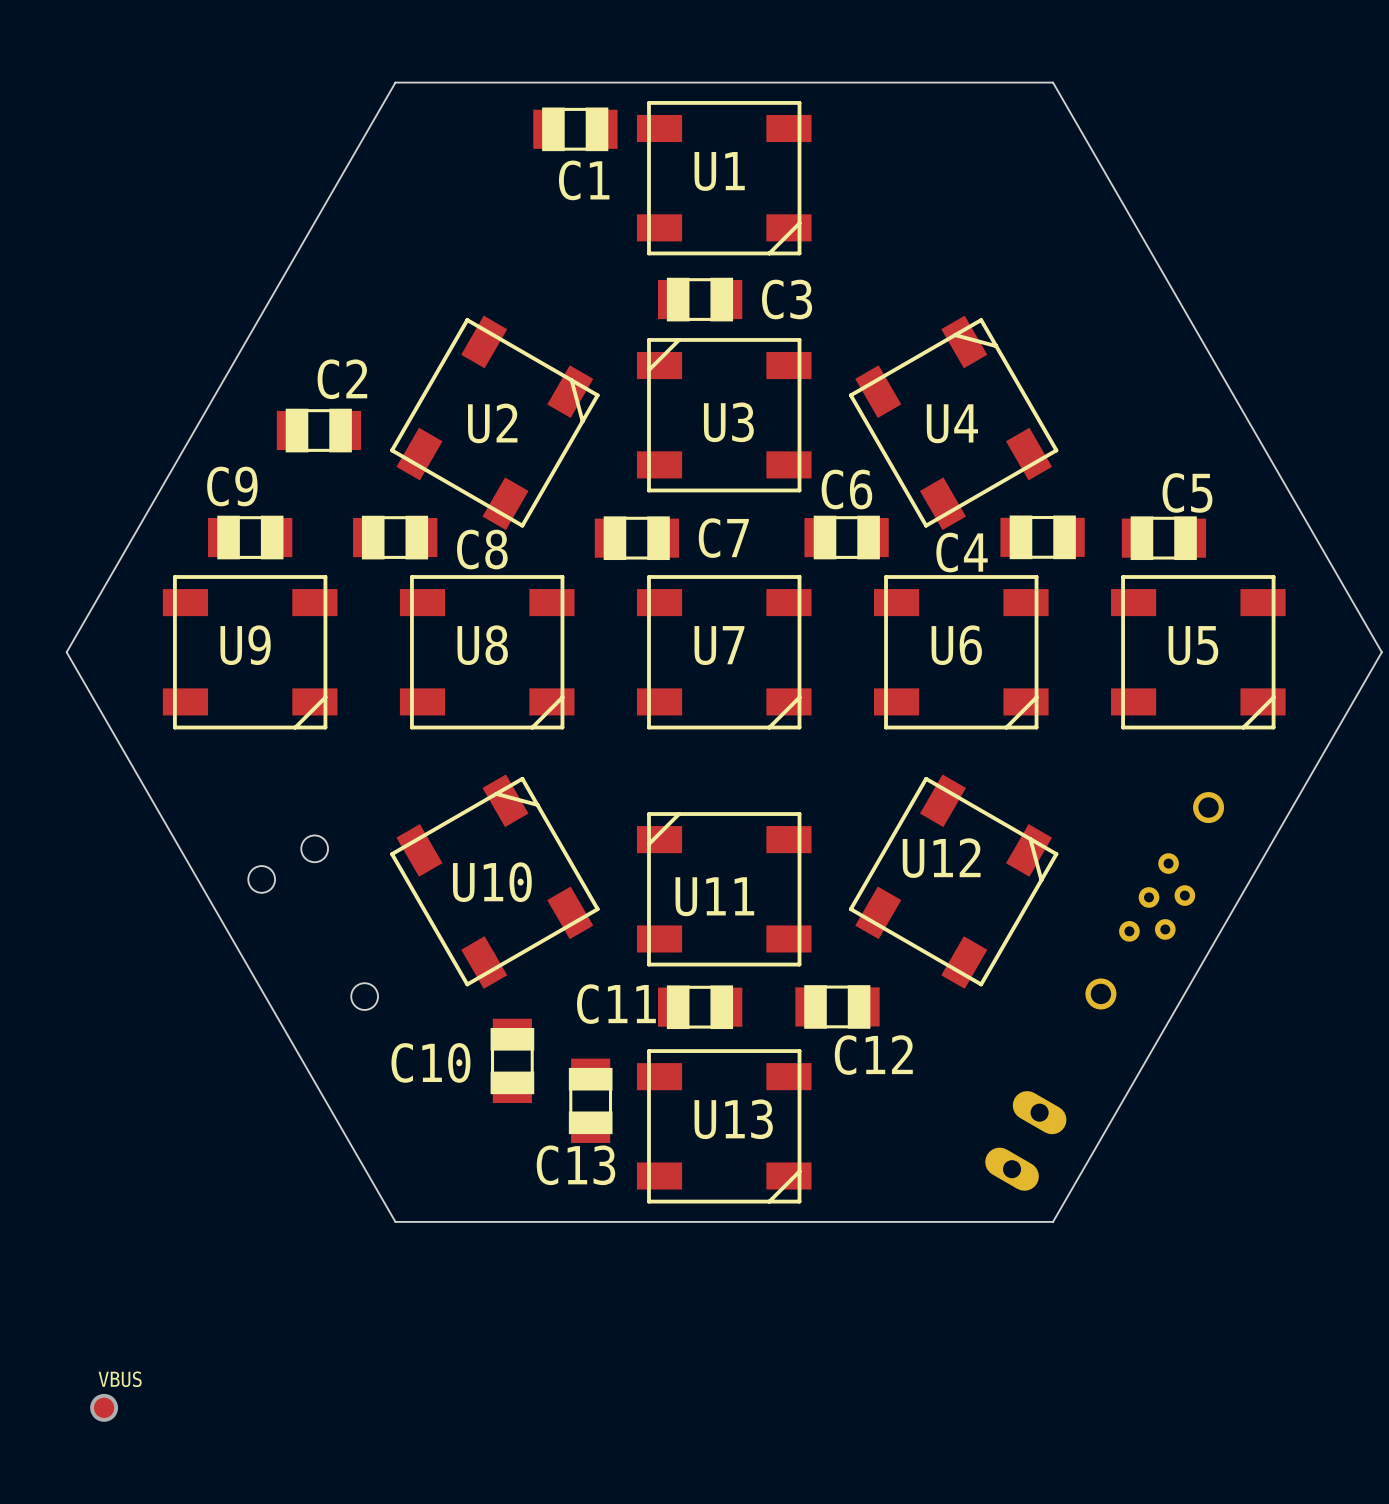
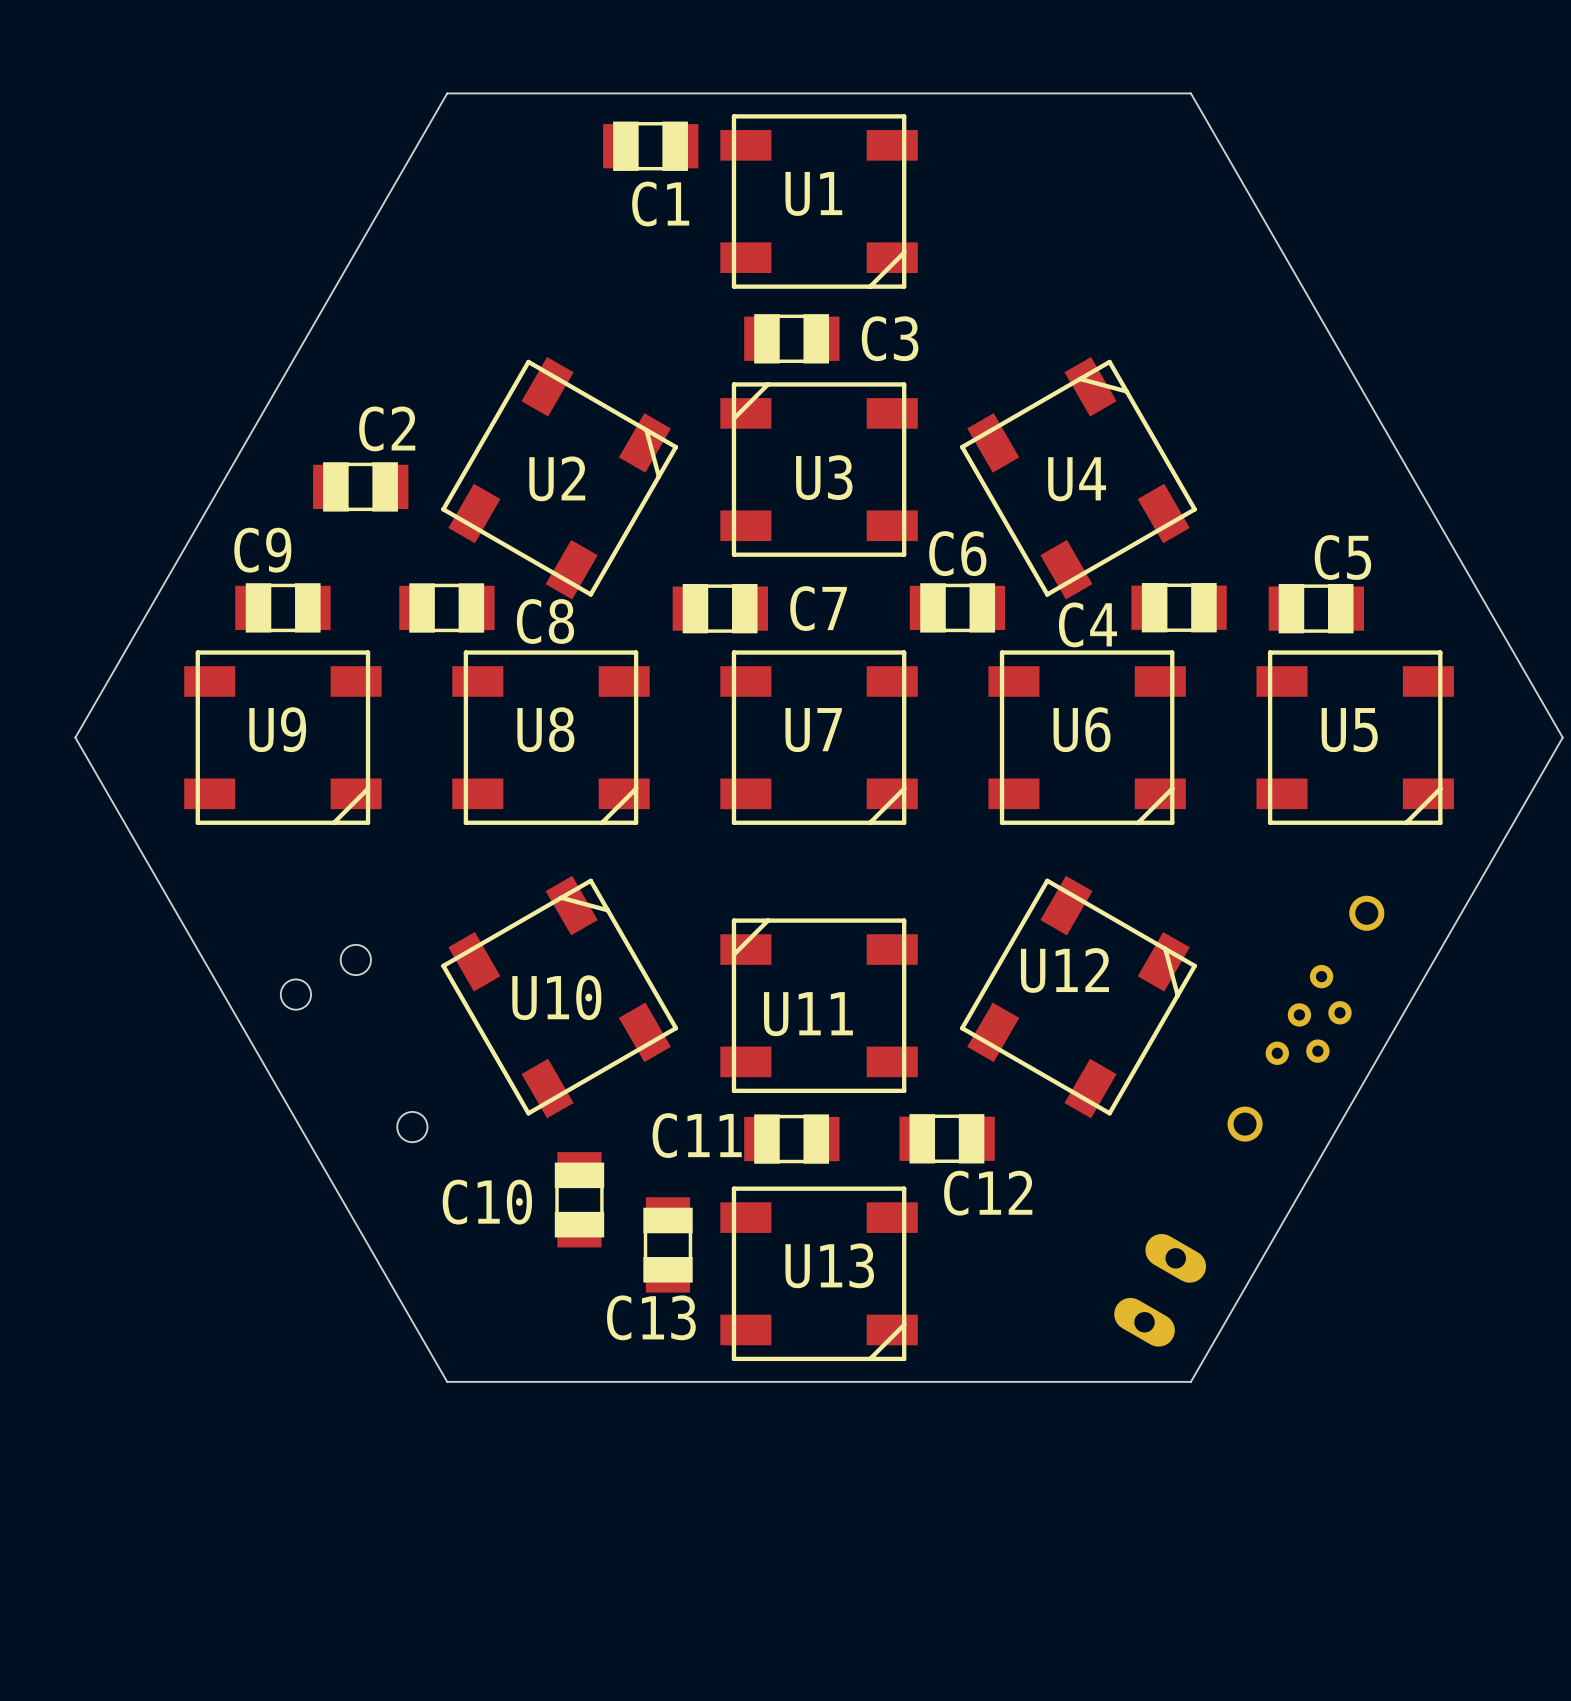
VBUS: (104, 1407) -> none

